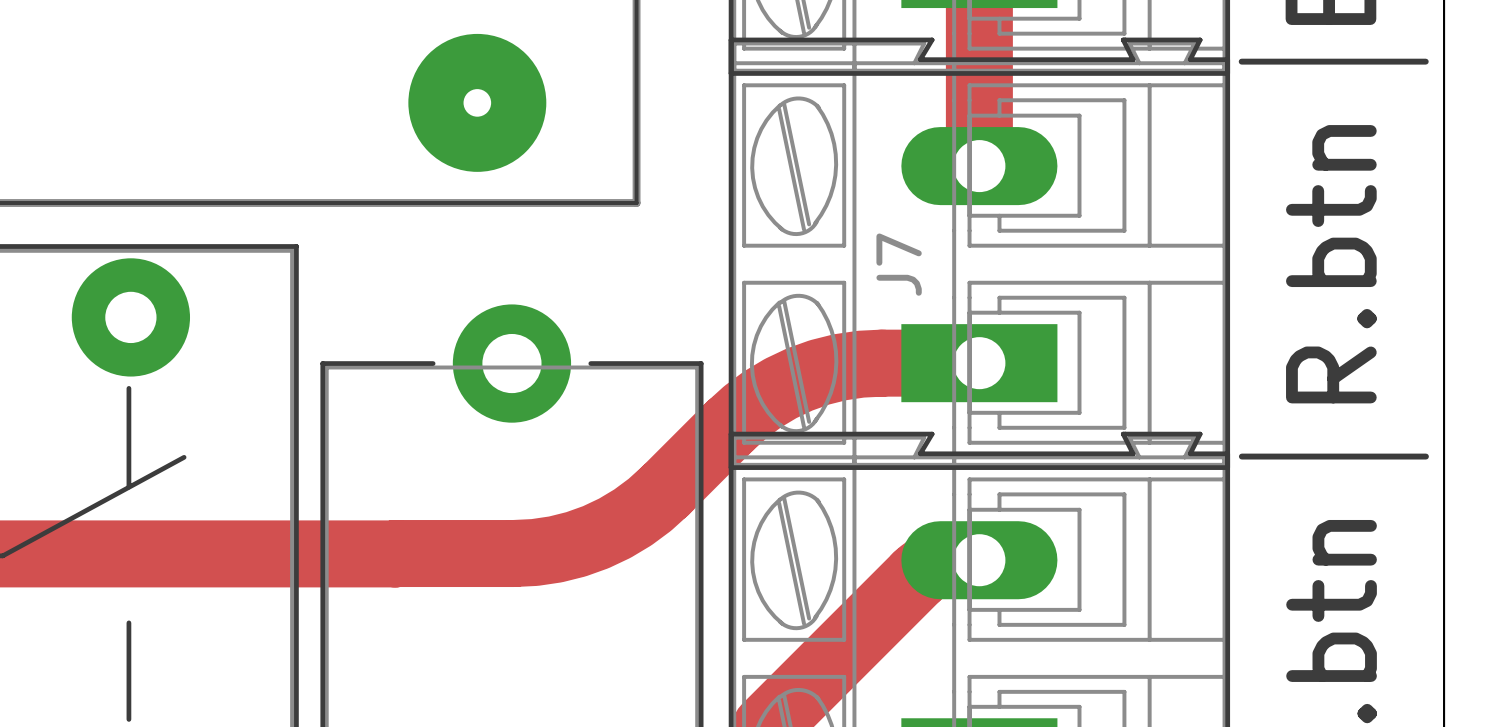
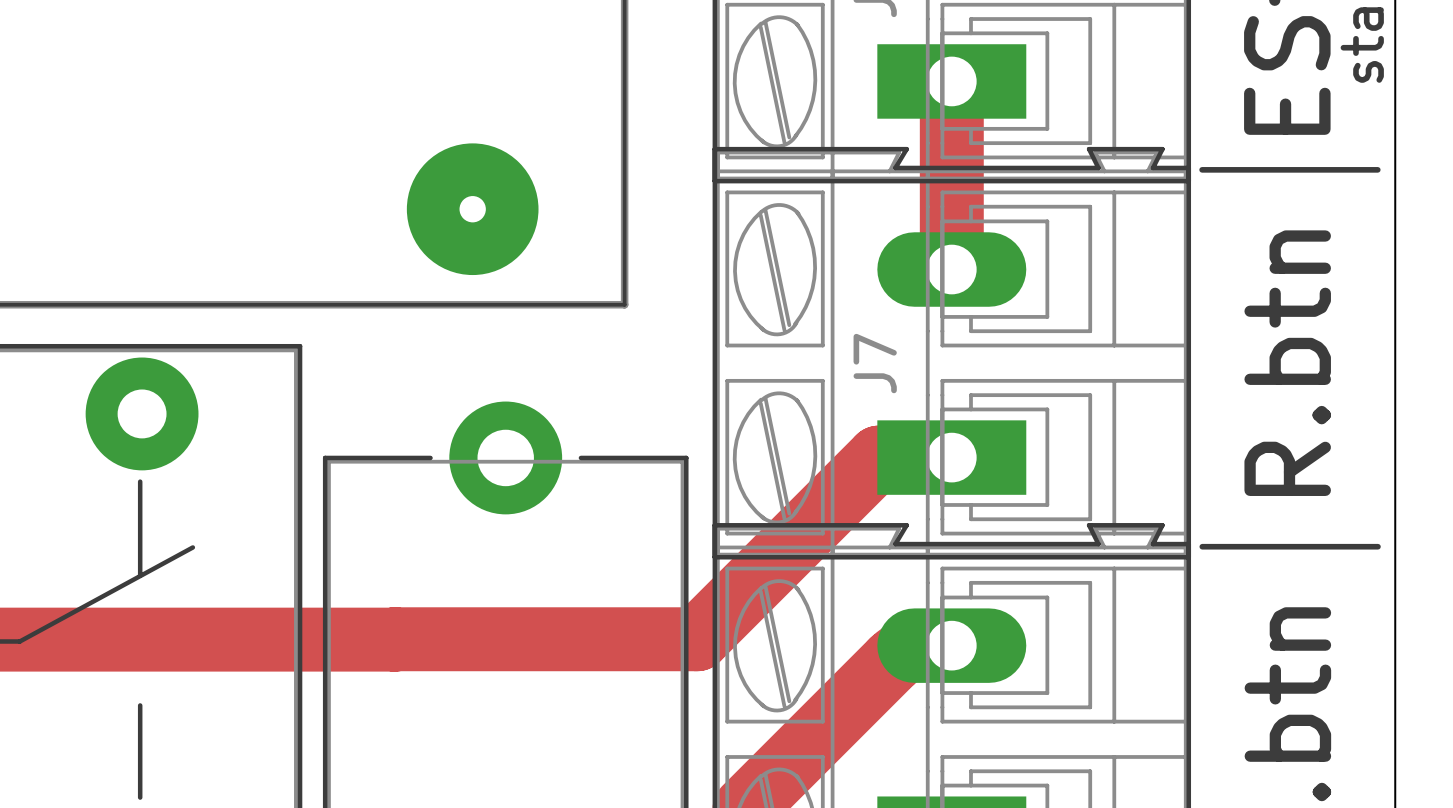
track: (902, 363) (860, 364) (839, 367) (819, 372) (780, 388) (745, 411) (665, 490) (632, 517) (595, 537) (576, 544) (555, 549) (513, 553) -> (878, 457) (697, 639) (507, 639)

